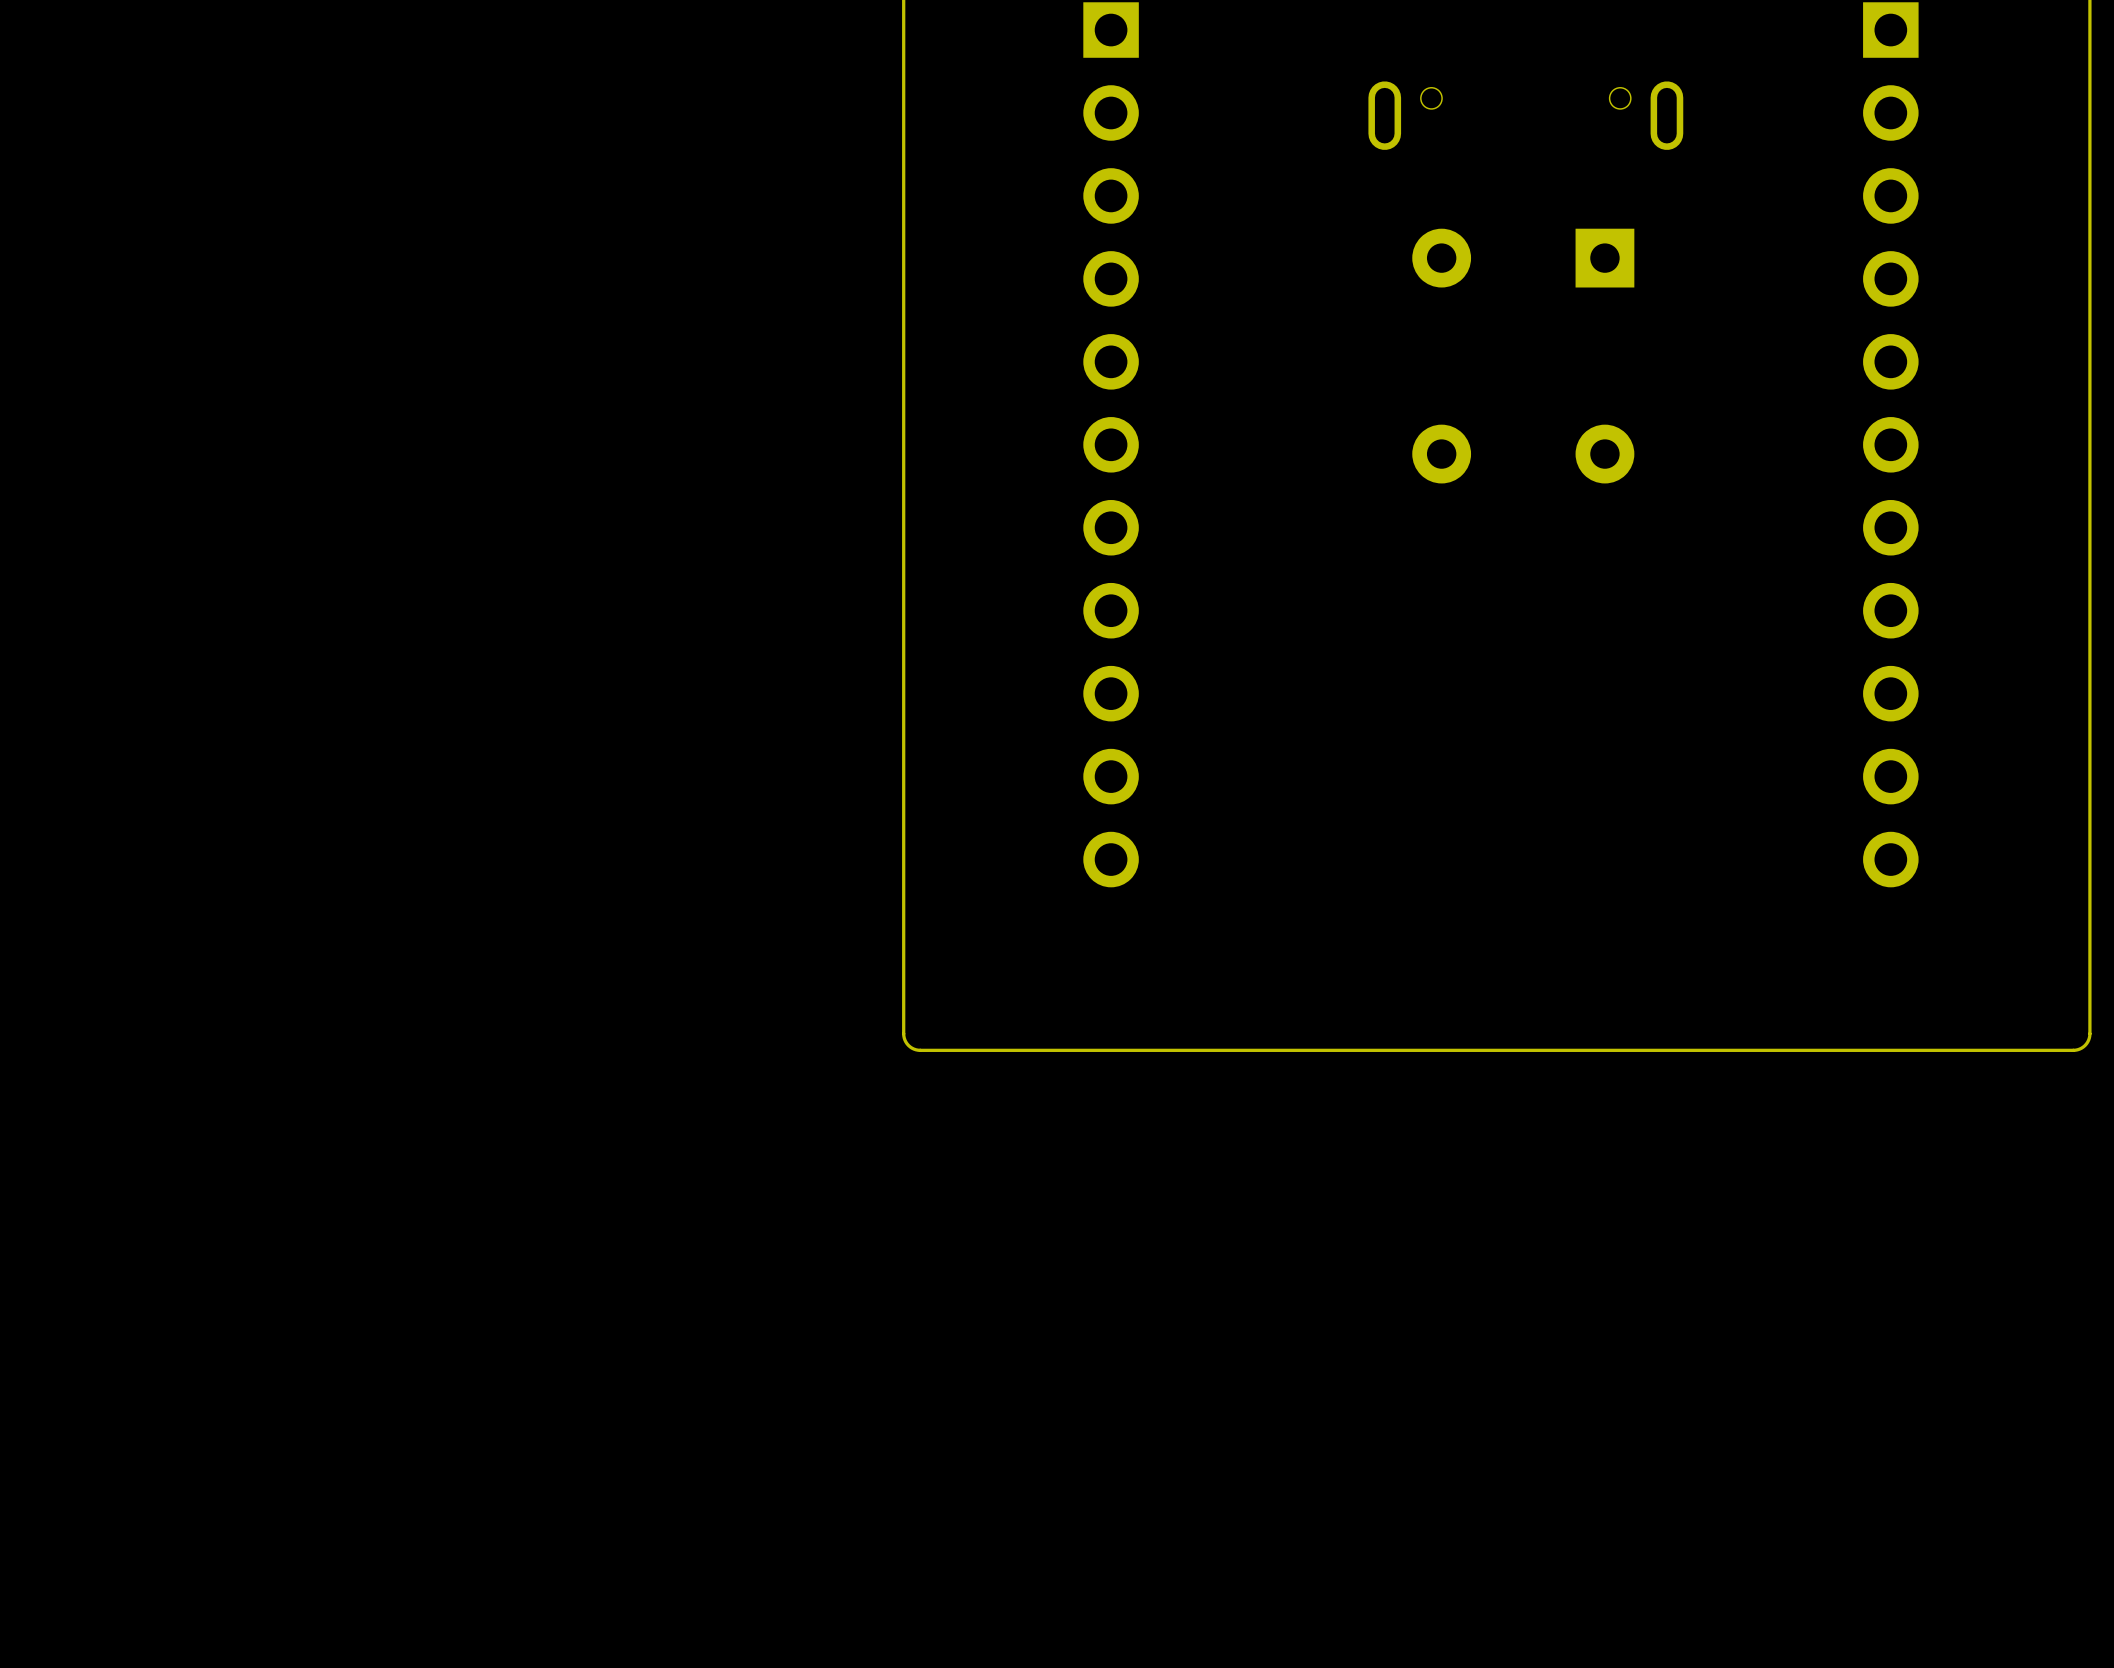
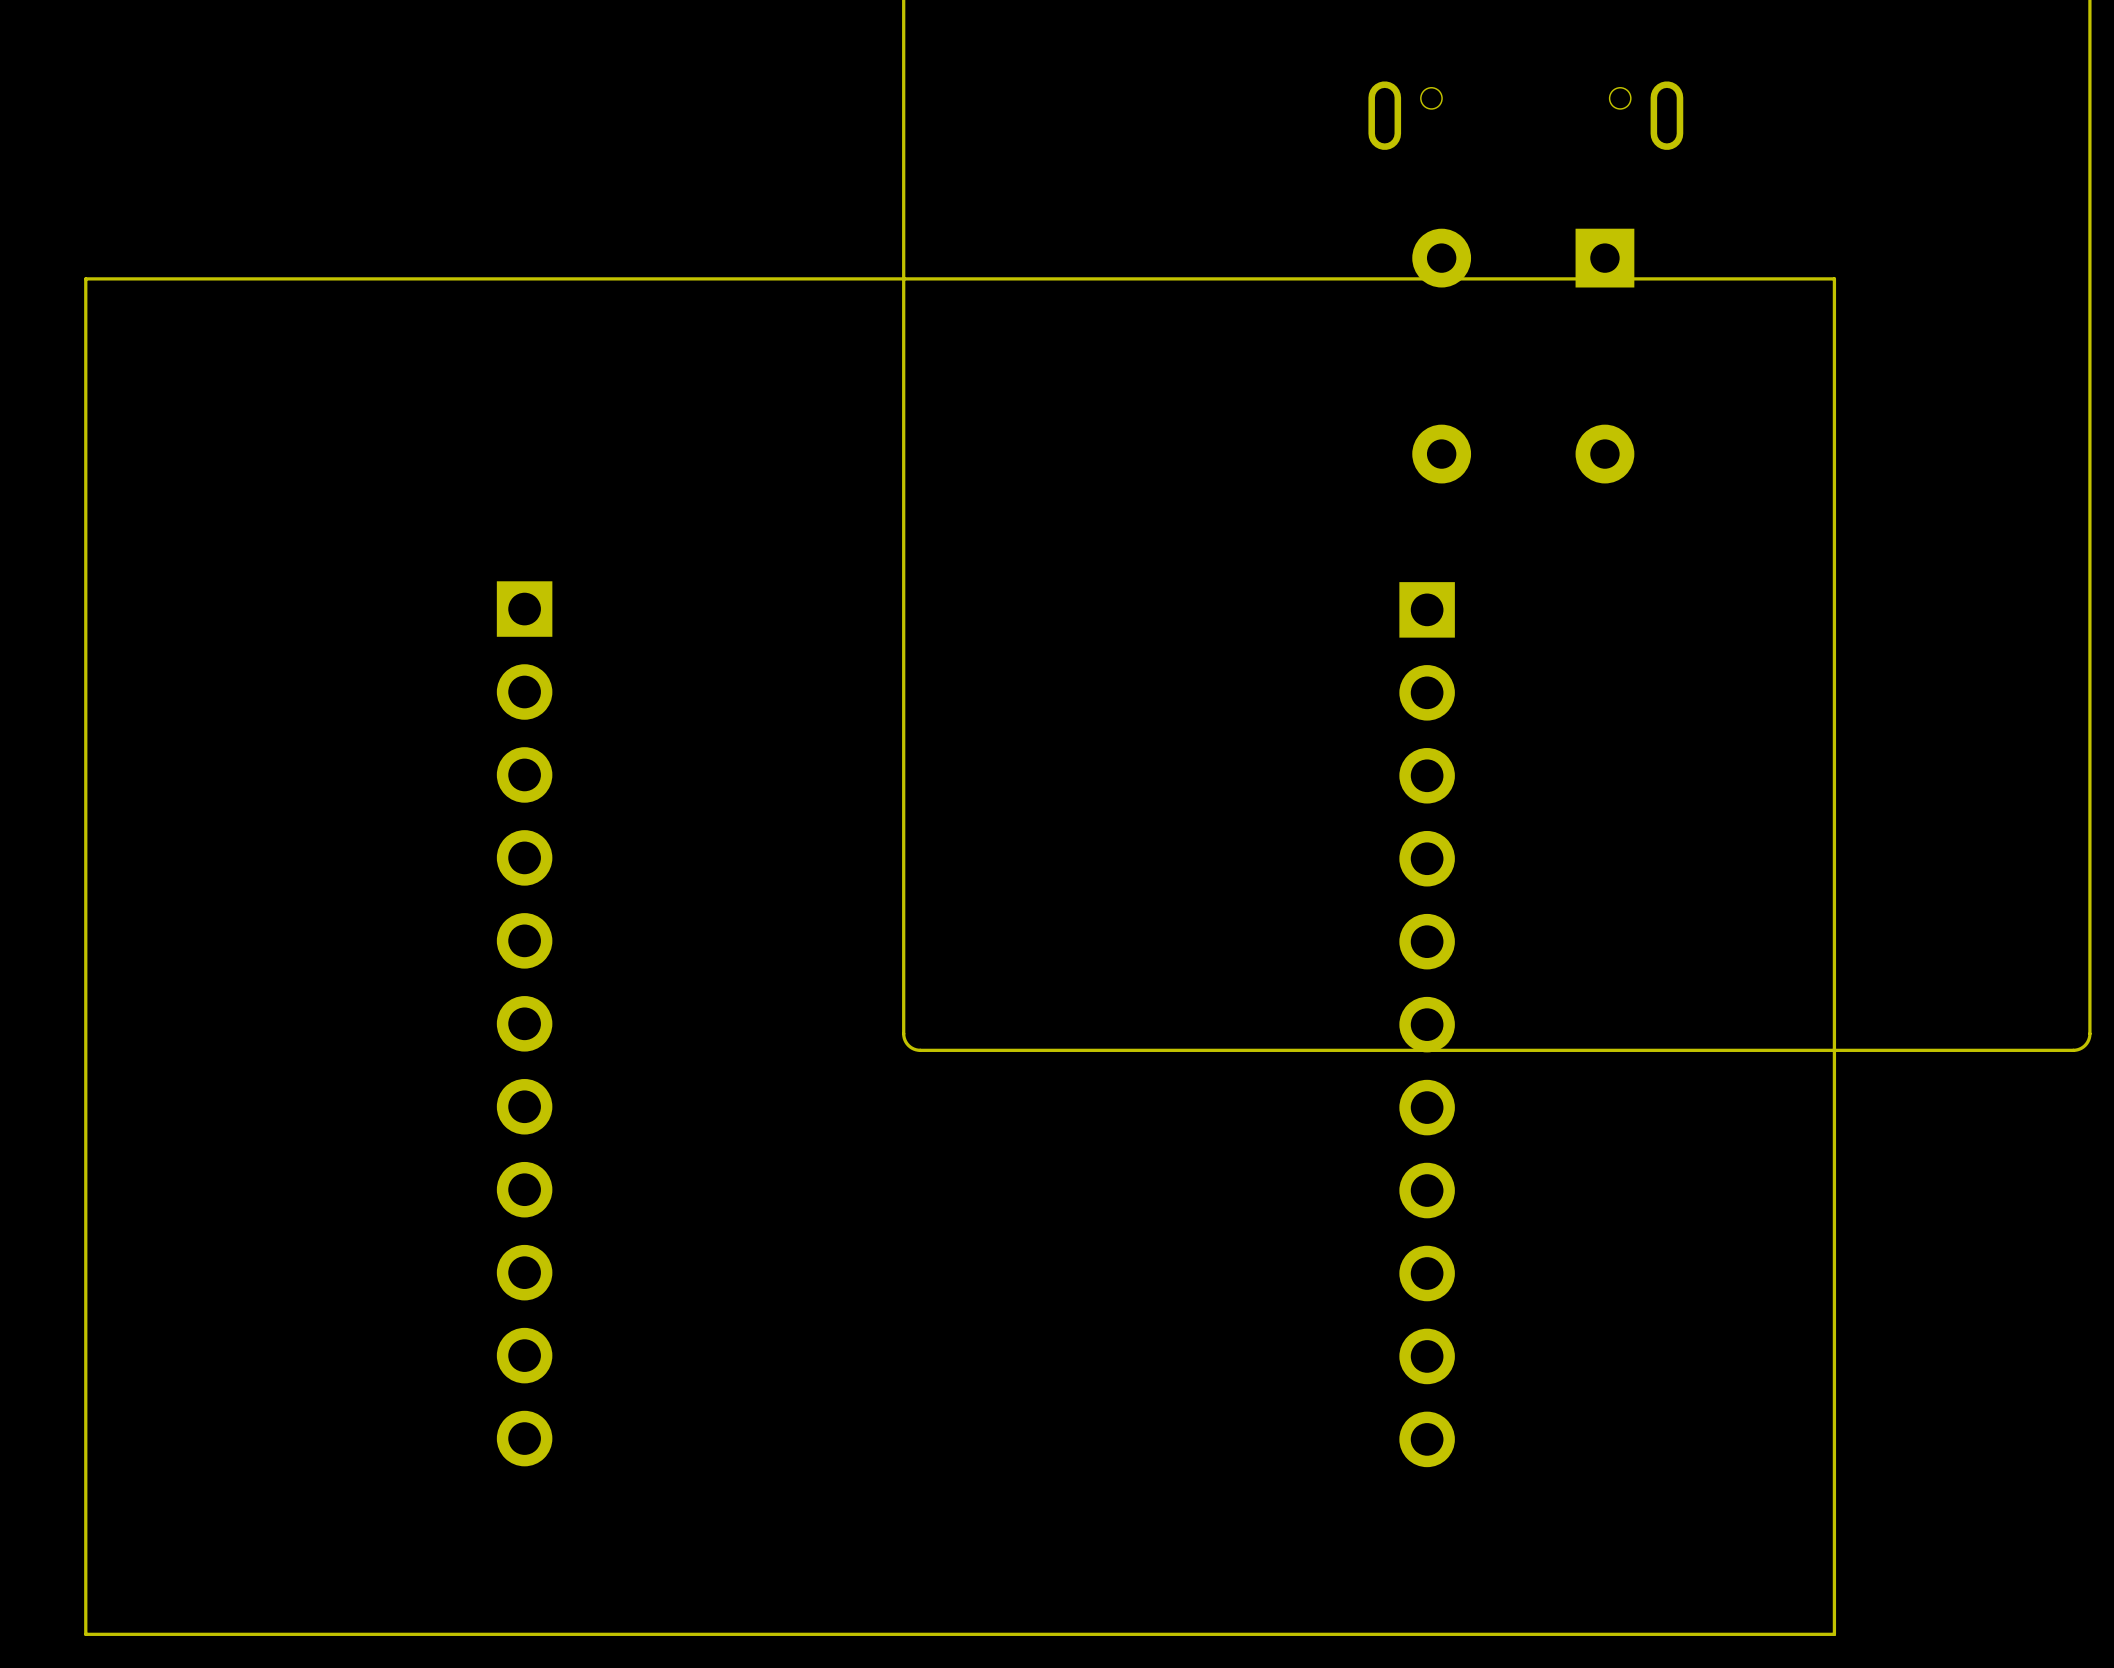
board edge: none -> (1834, 278) (85, 278) (85, 1634) (1834, 1634) (1834, 278)
part: (1111, 444) -> none
part: (1890, 444) -> none
part: none -> (524, 1023)
part: none -> (1427, 1024)

